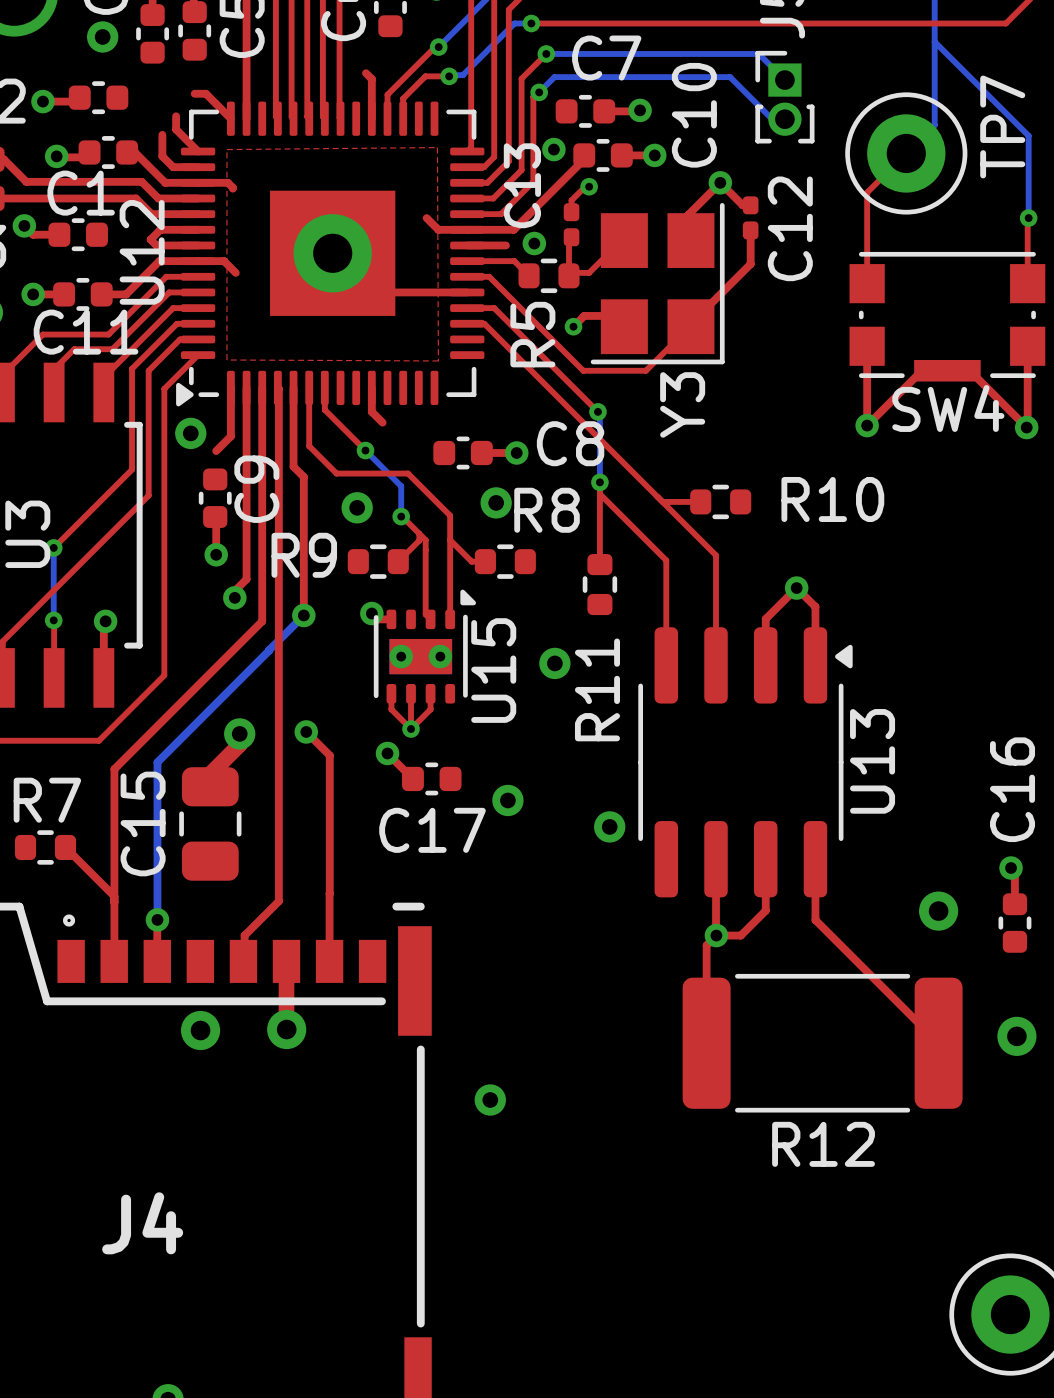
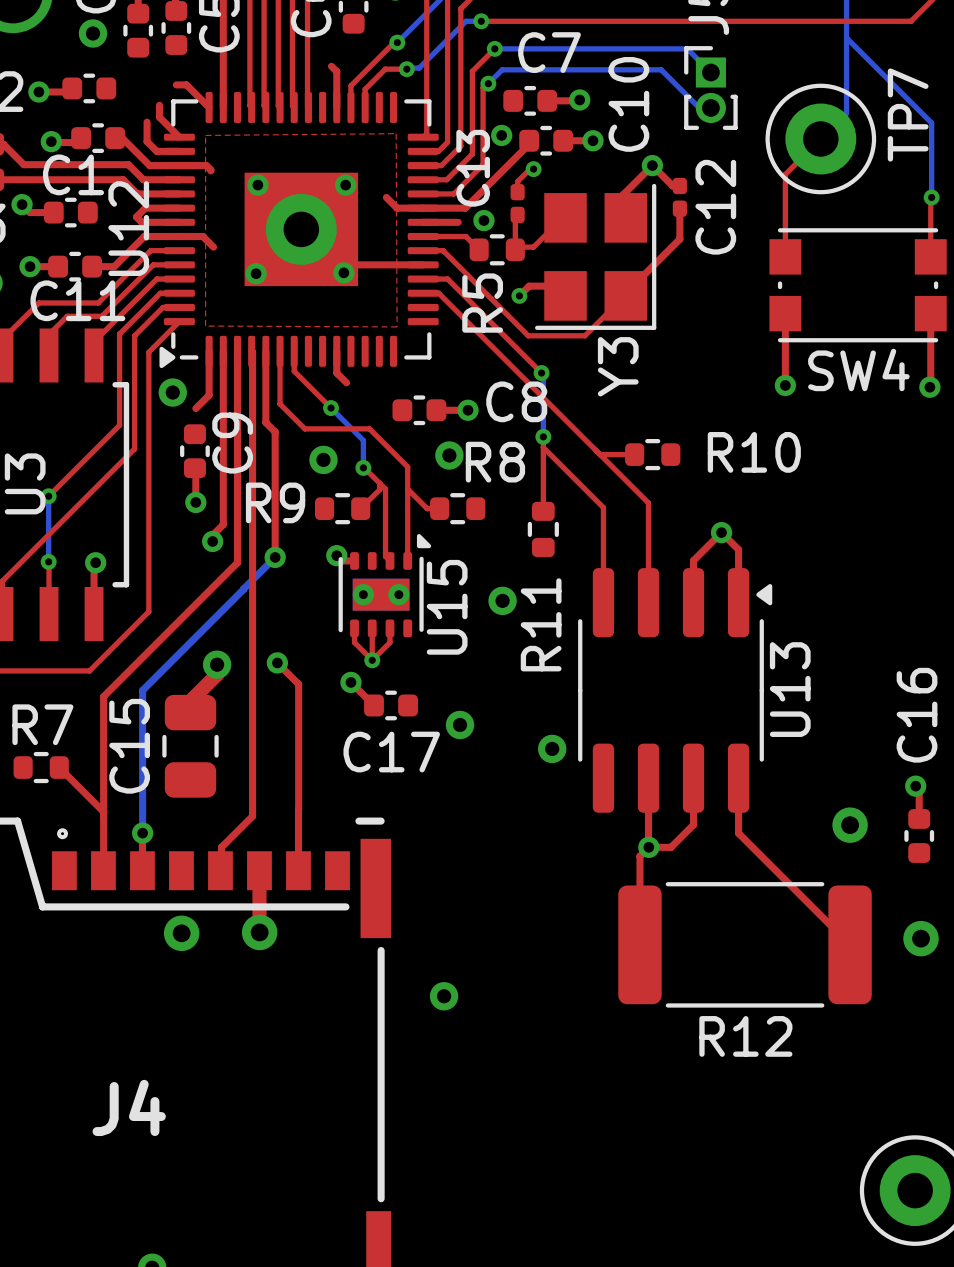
via: none -> (257, 185)
via: none -> (345, 185)
SW4 footprint: [849, 251, 1046, 382] -> [769, 228, 947, 343]
via: none -> (343, 272)
via: none -> (256, 273)
top track: (867, 425) (921, 370) (969, 370) (1026, 427) -> none

